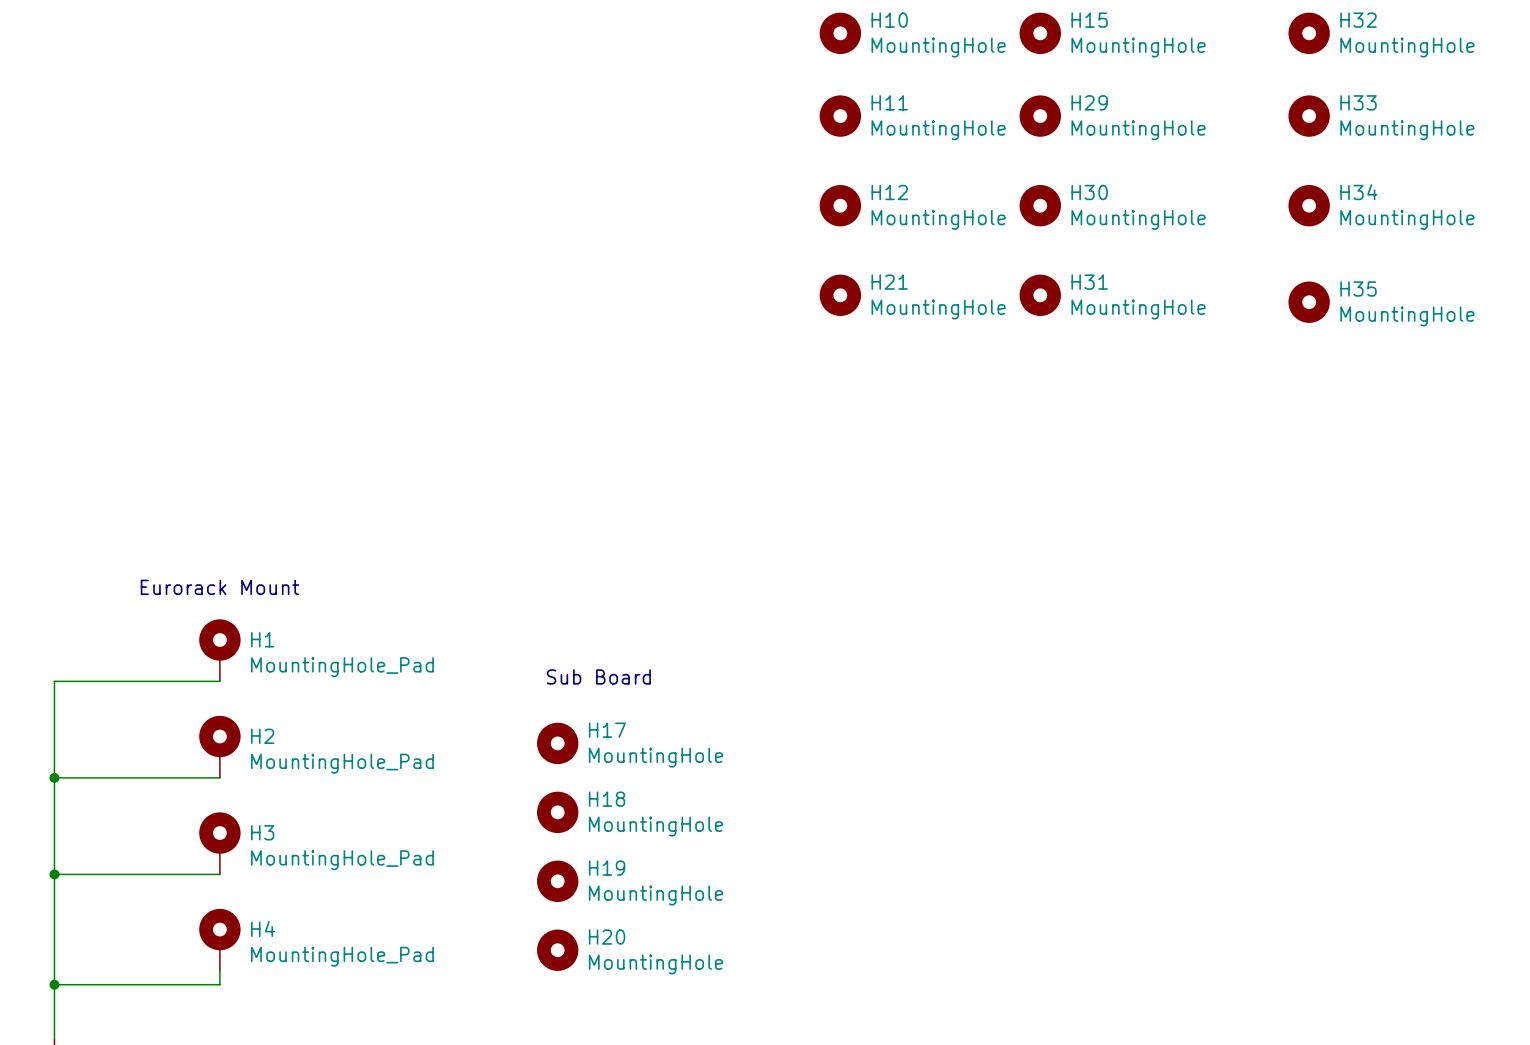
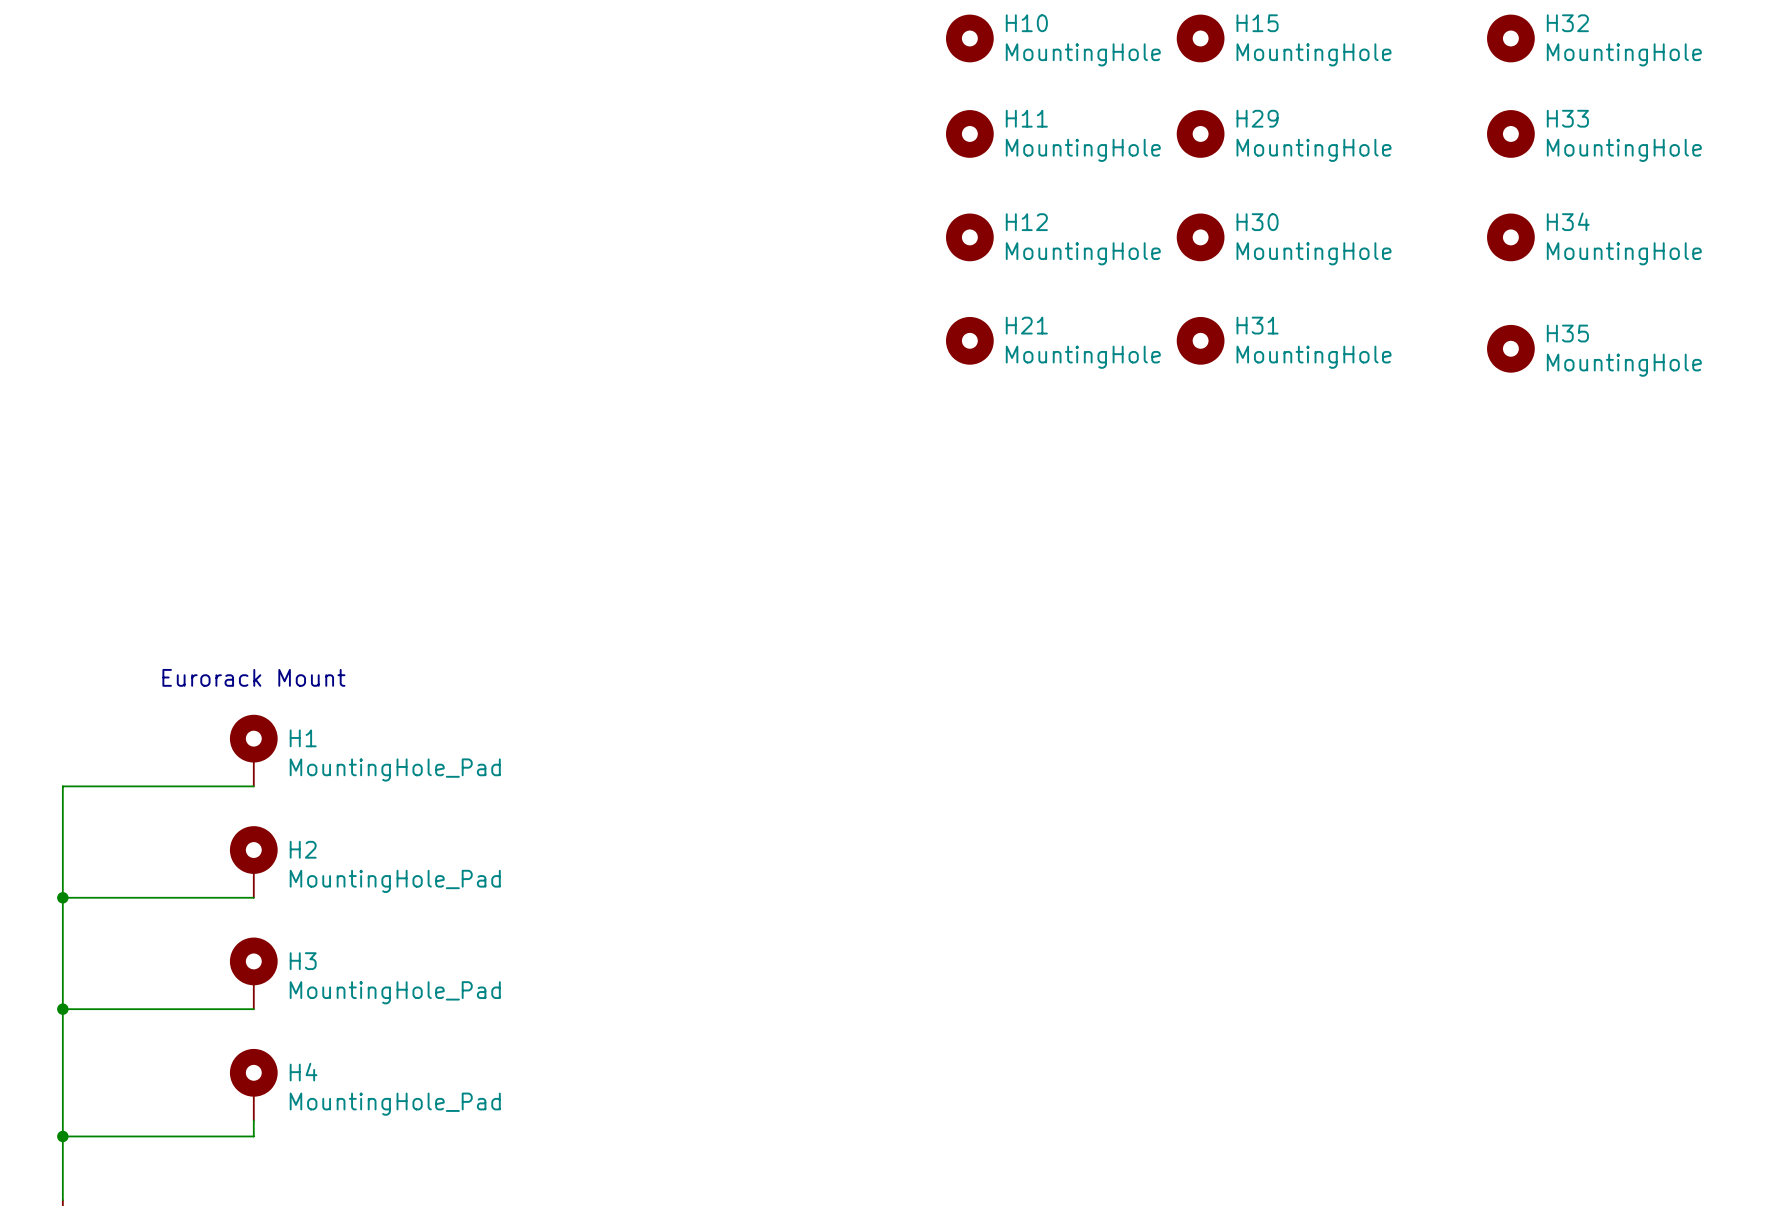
text: Sub Board (598, 676) -> none
H17: MountingHole (557, 743) -> none
H18: MountingHole (557, 812) -> none
H19: MountingHole (557, 881) -> none
H20: MountingHole (557, 950) -> none

